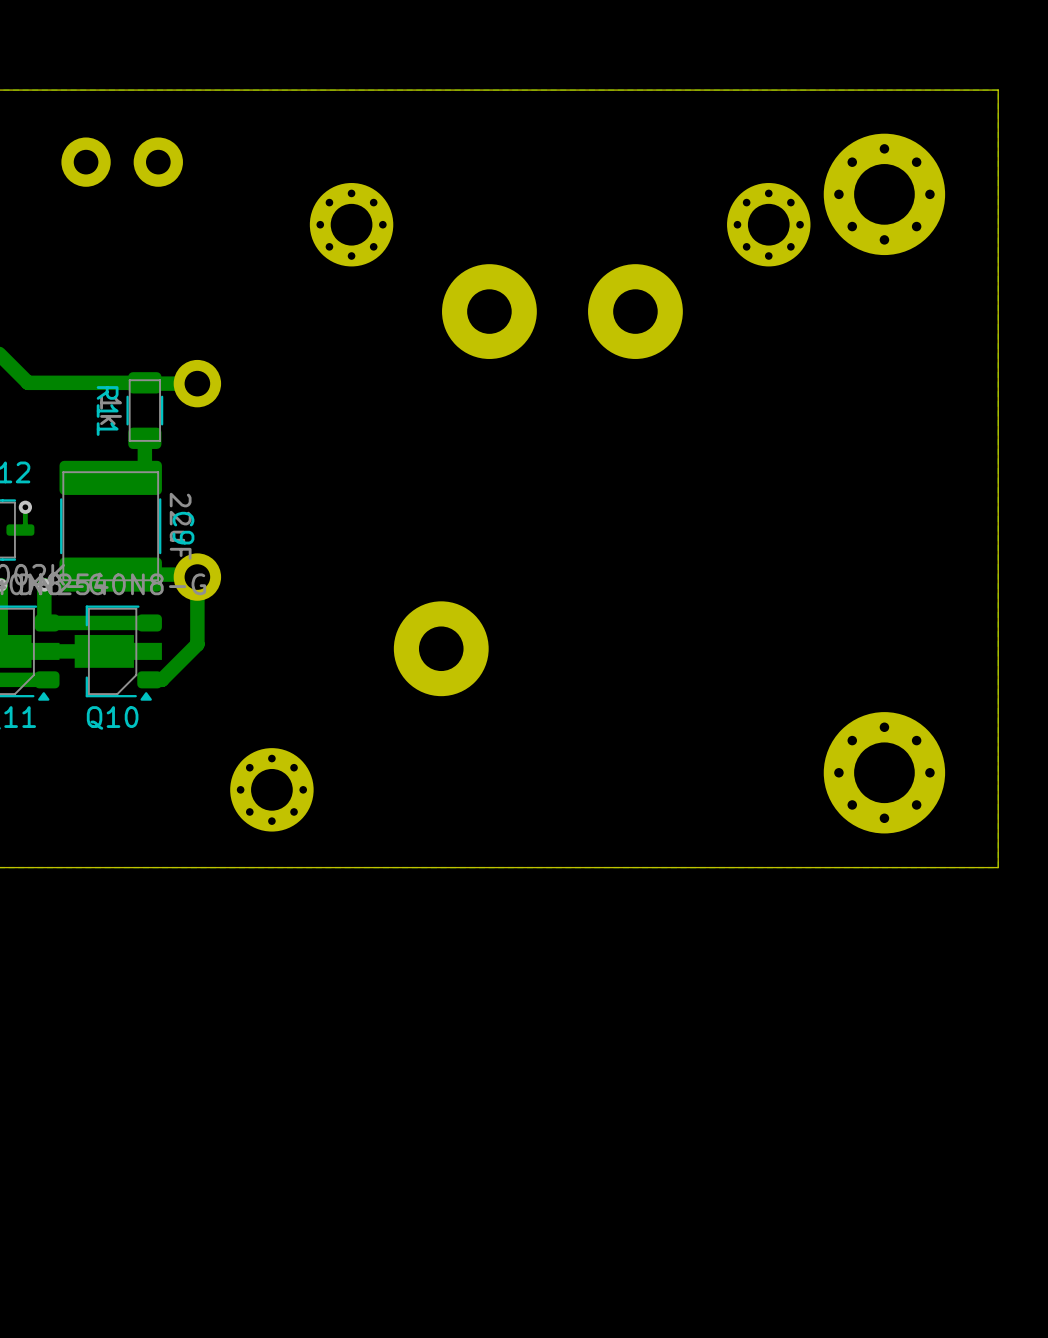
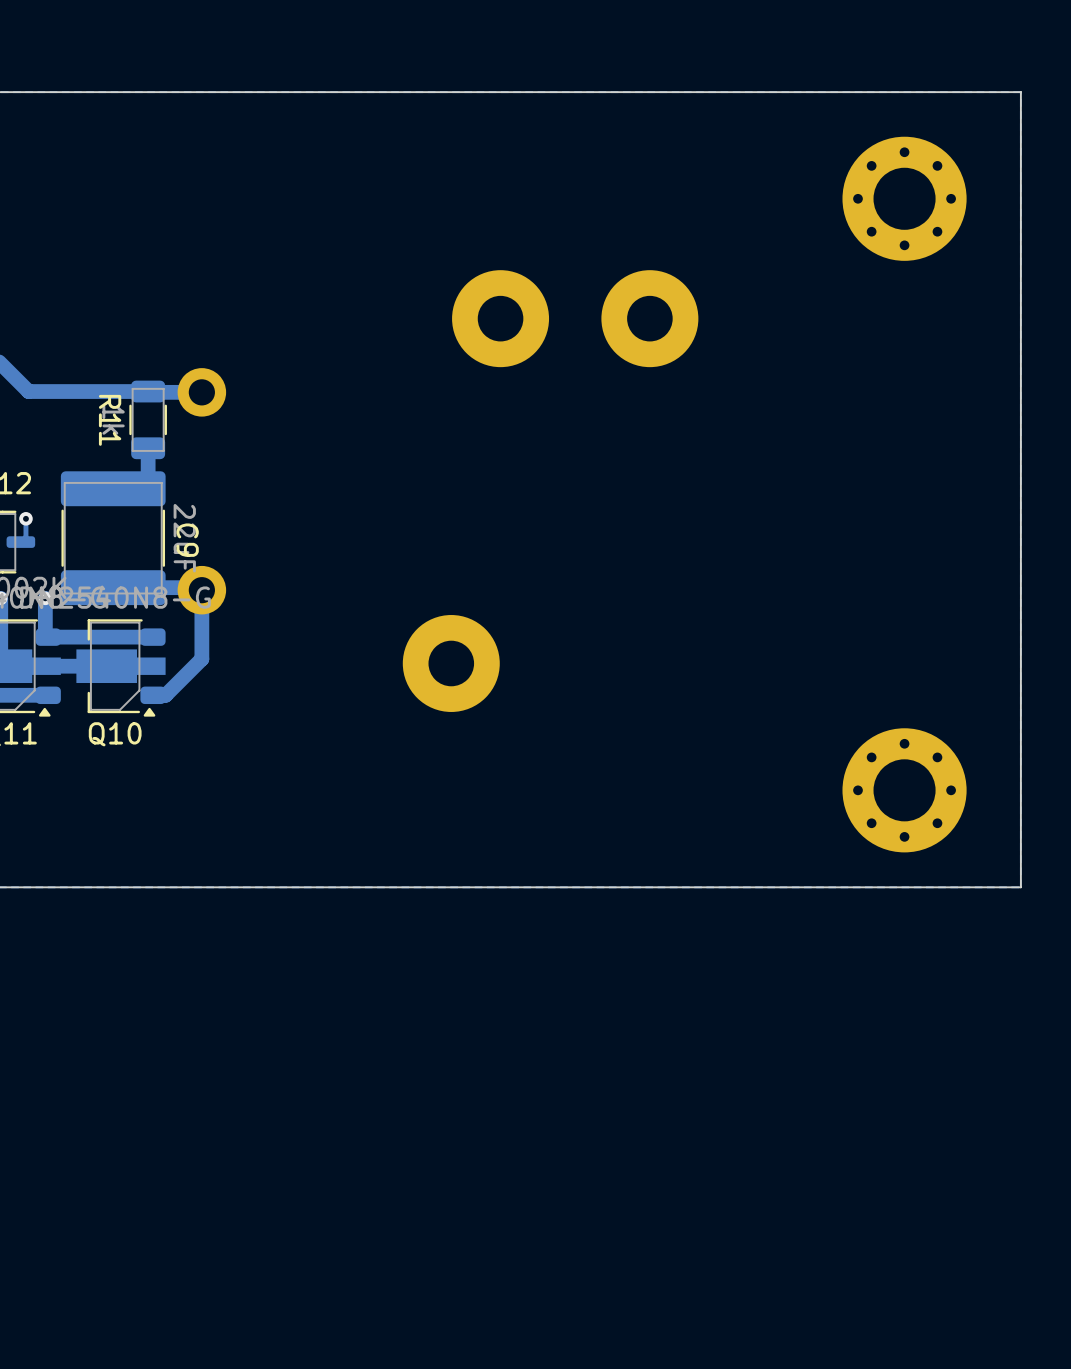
part: (122, 162) -> none
part: (351, 224) -> none
part: (768, 224) -> none
part: (271, 789) -> none

